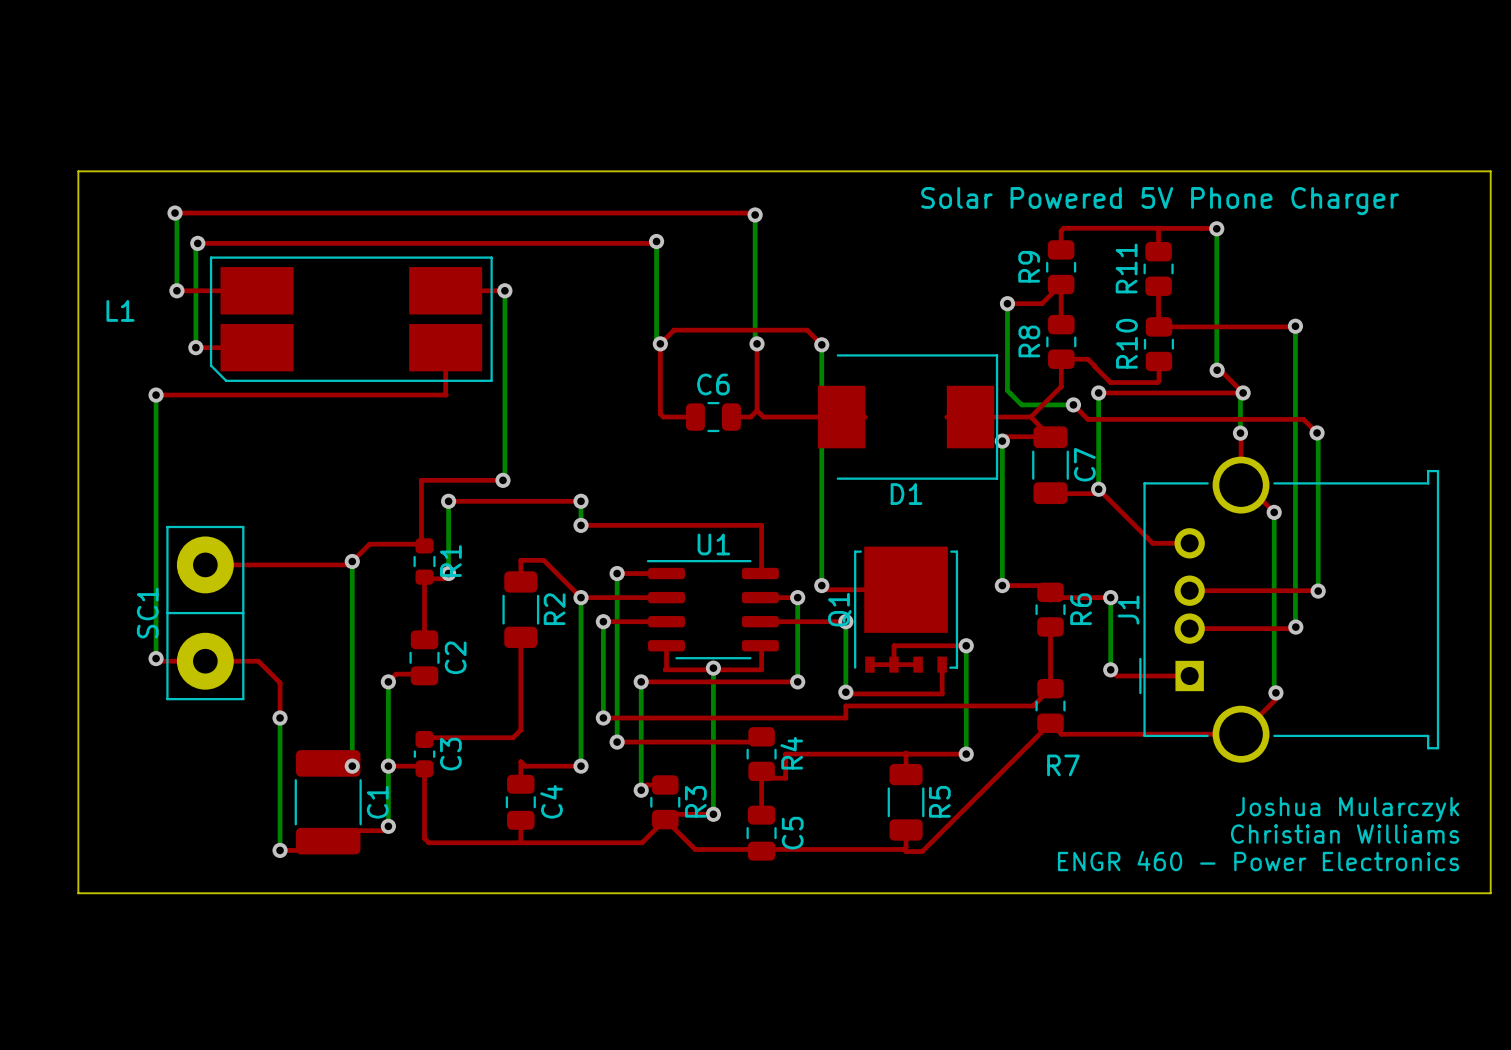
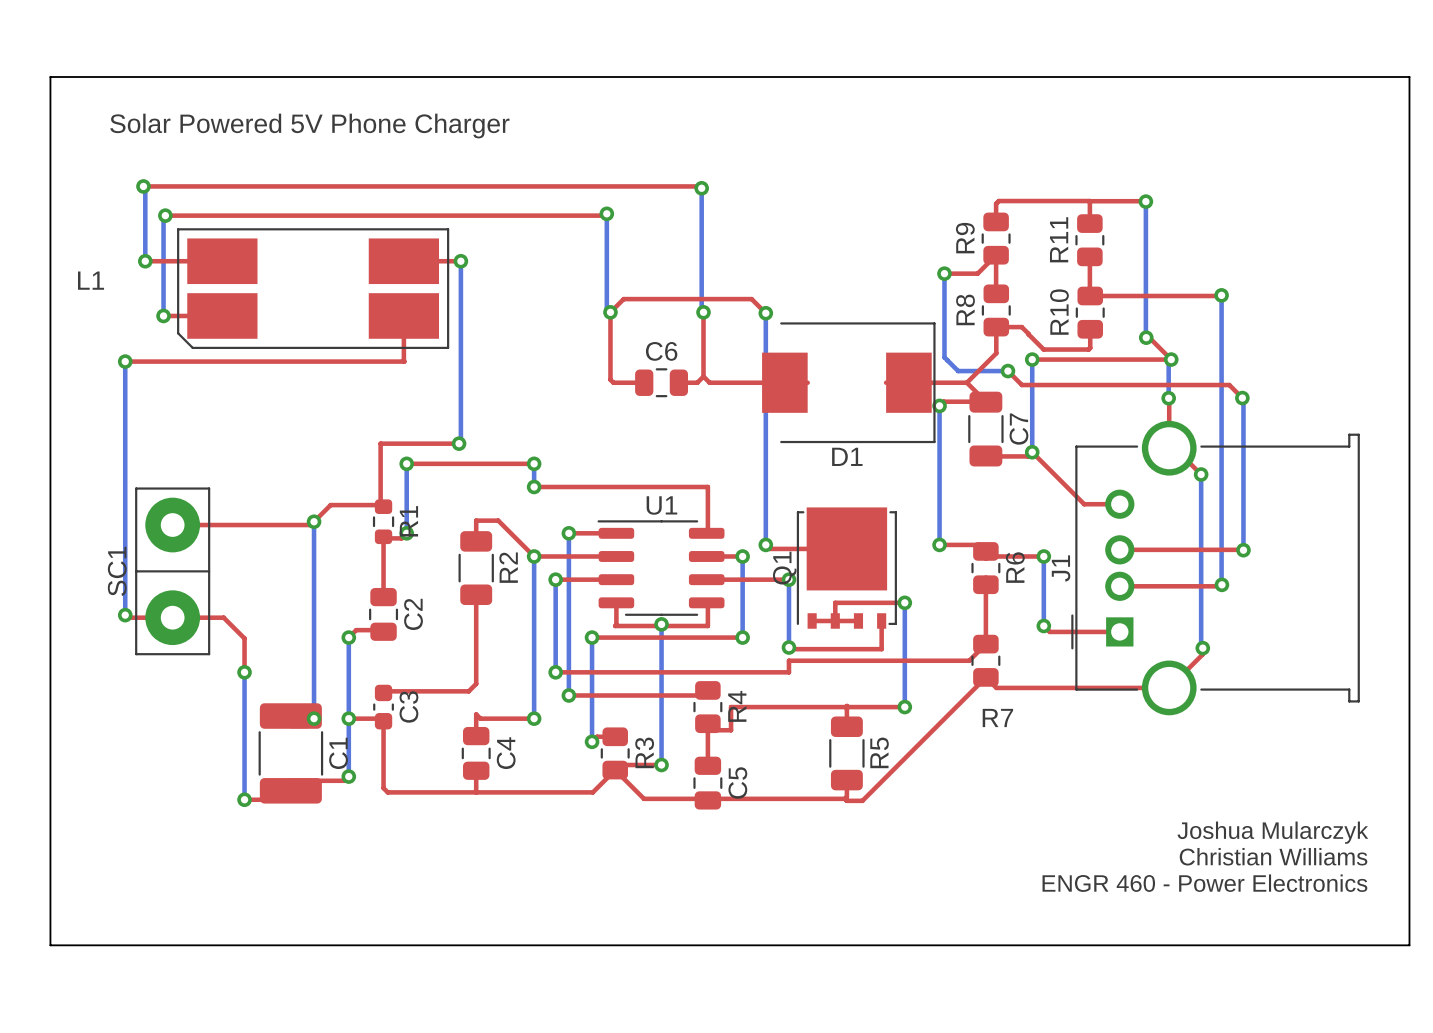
text: none -> Solar Powered 5V Phone Charger (309, 126)
board edge: (78, 171) (1490, 171) -> (50, 146) (50, 77) (1409, 77) (1409, 146)
text: Solar Powered 5V Phone Charger (1160, 201) -> none
text position: Joshua Mularczyk (1347, 809) -> Joshua Mularczyk (1272, 832)
text position: Christian Williams (1345, 834) -> Christian Williams (1273, 856)
text position: ENGR 460 - Power Electronics (1258, 861) -> ENGR 460 - Power Electronics (1204, 883)
board edge: (78, 893) (1490, 893) -> (50, 840) (50, 945) (1409, 945) (1409, 840)

